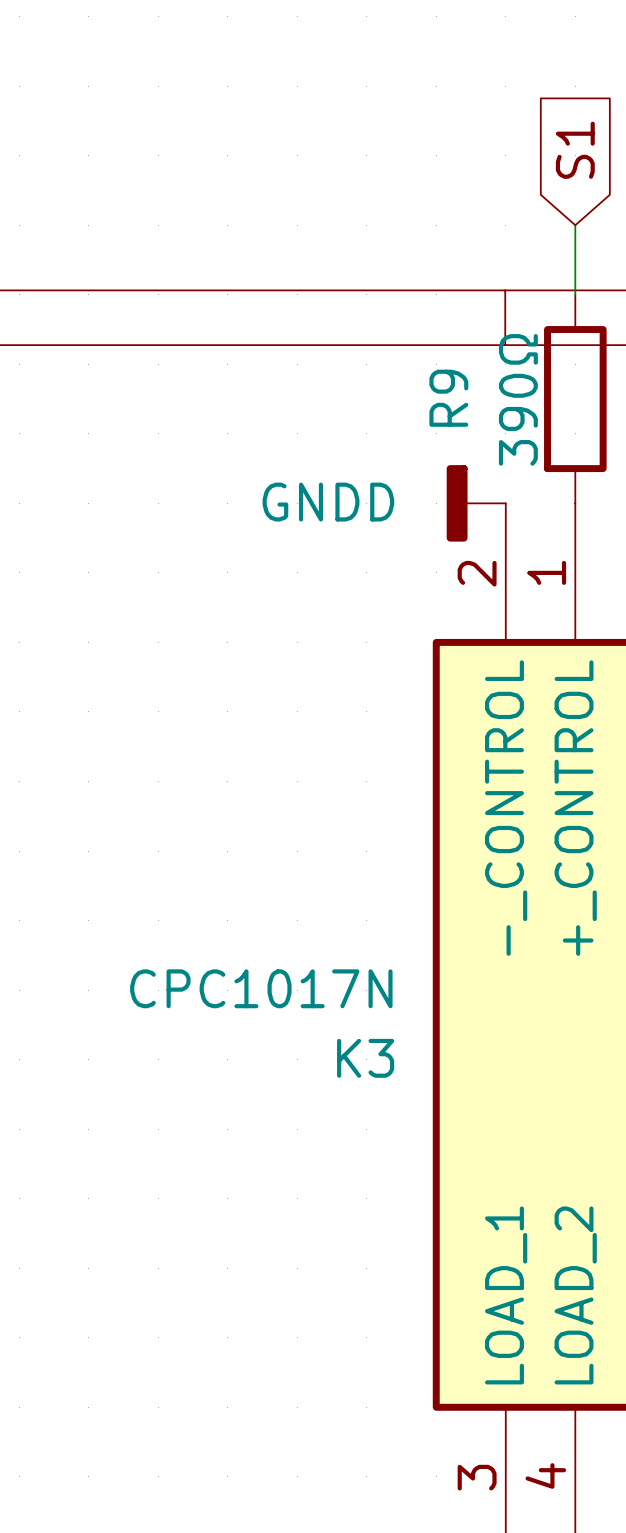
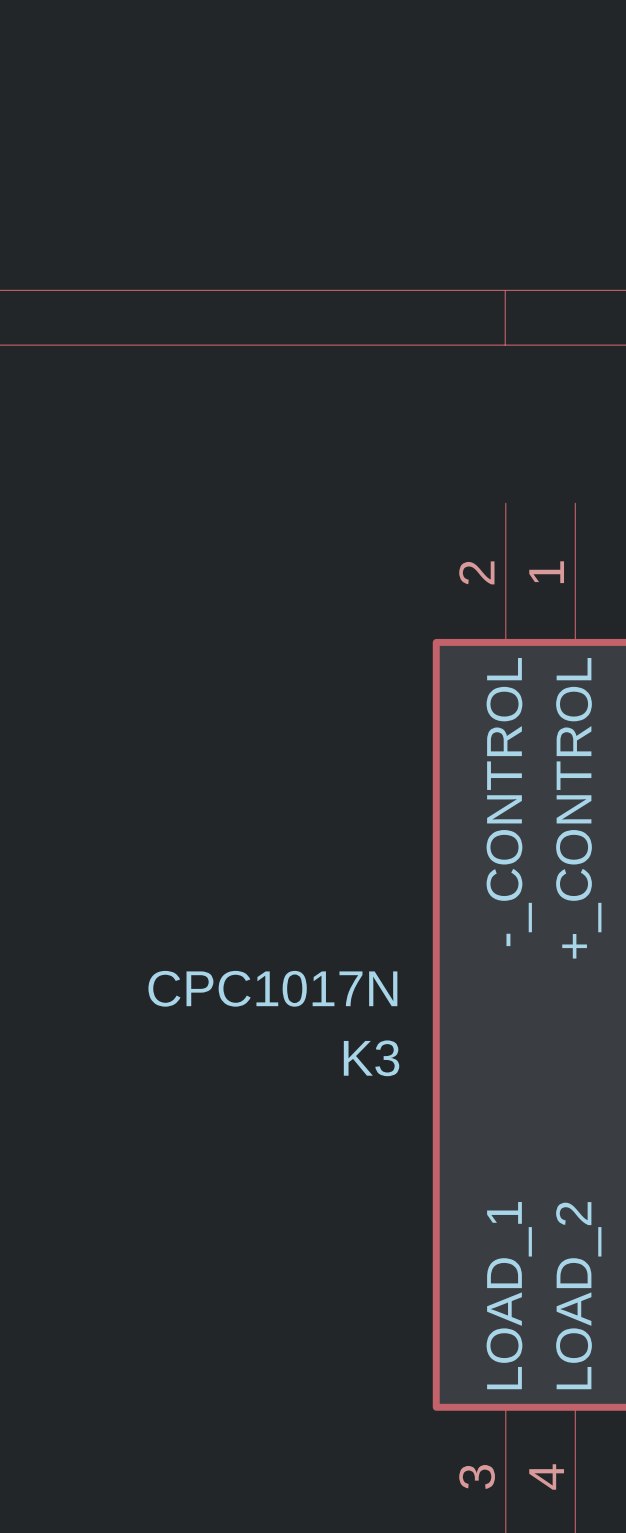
global label: S1 (575, 150) -> none
wire: (575, 225) (575, 294) -> none
R9: 390Ω (575, 399) -> none
power symbol: GNDD (476, 503) -> none

